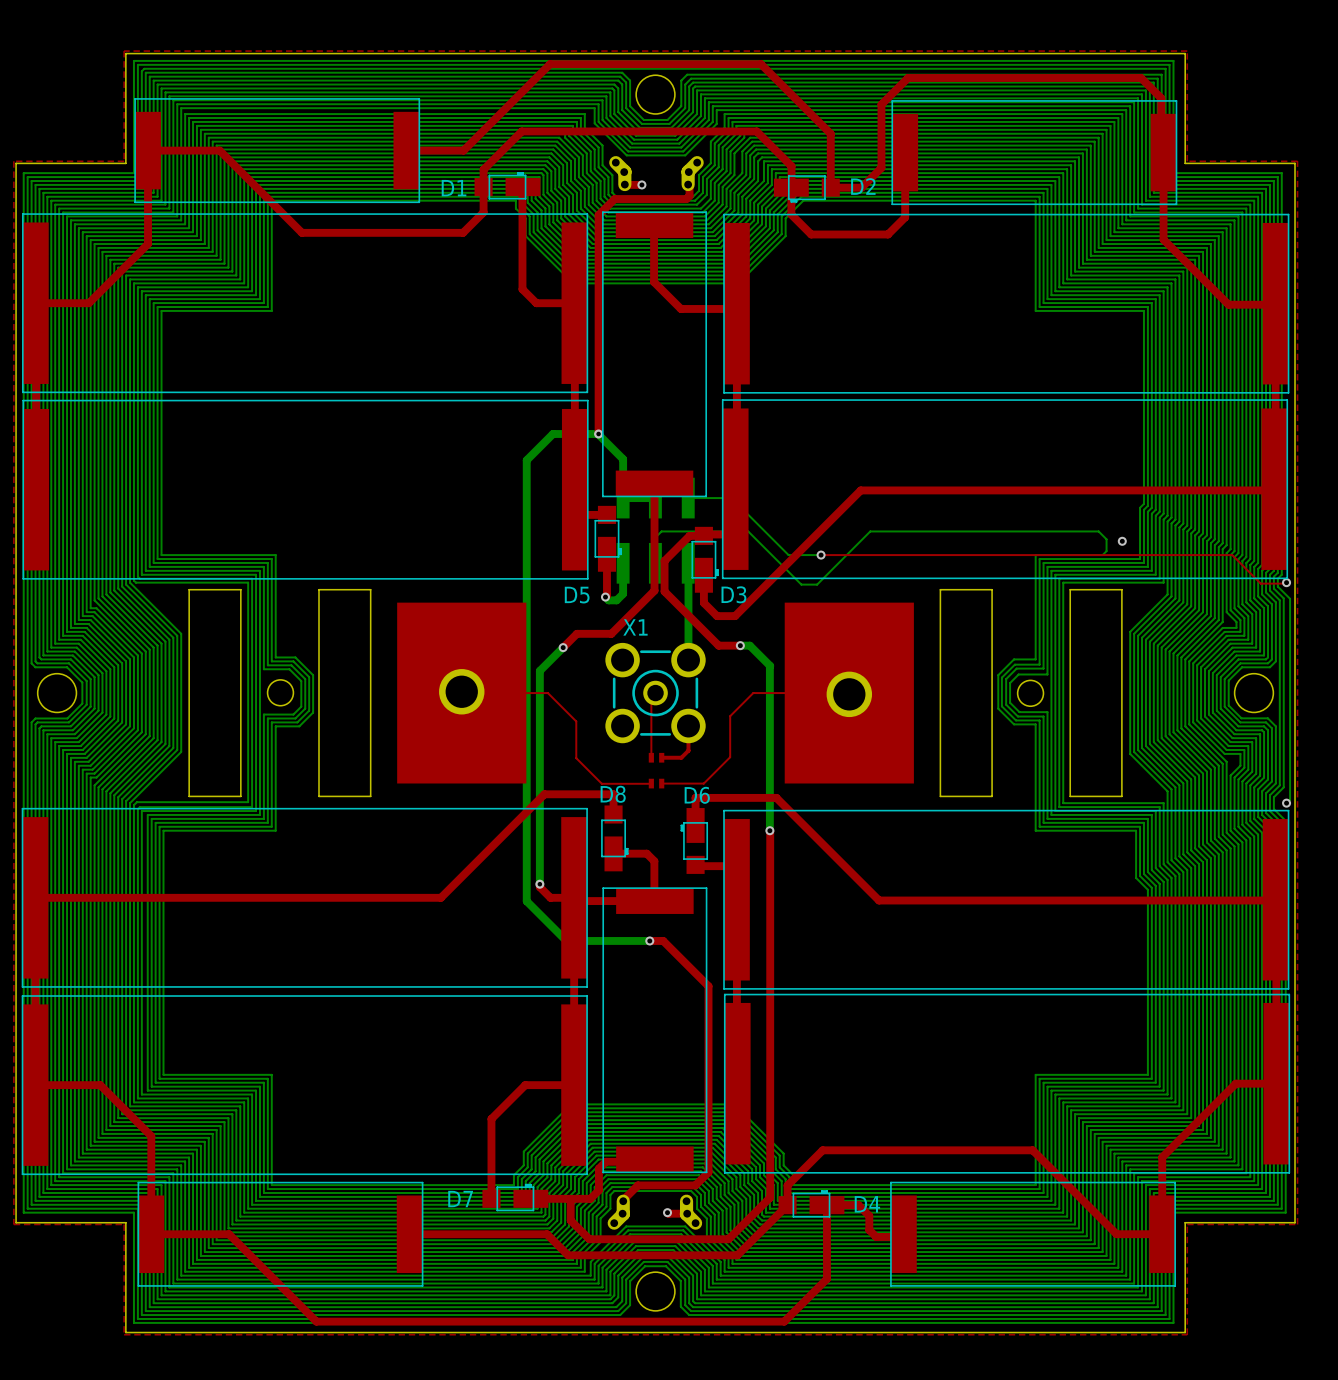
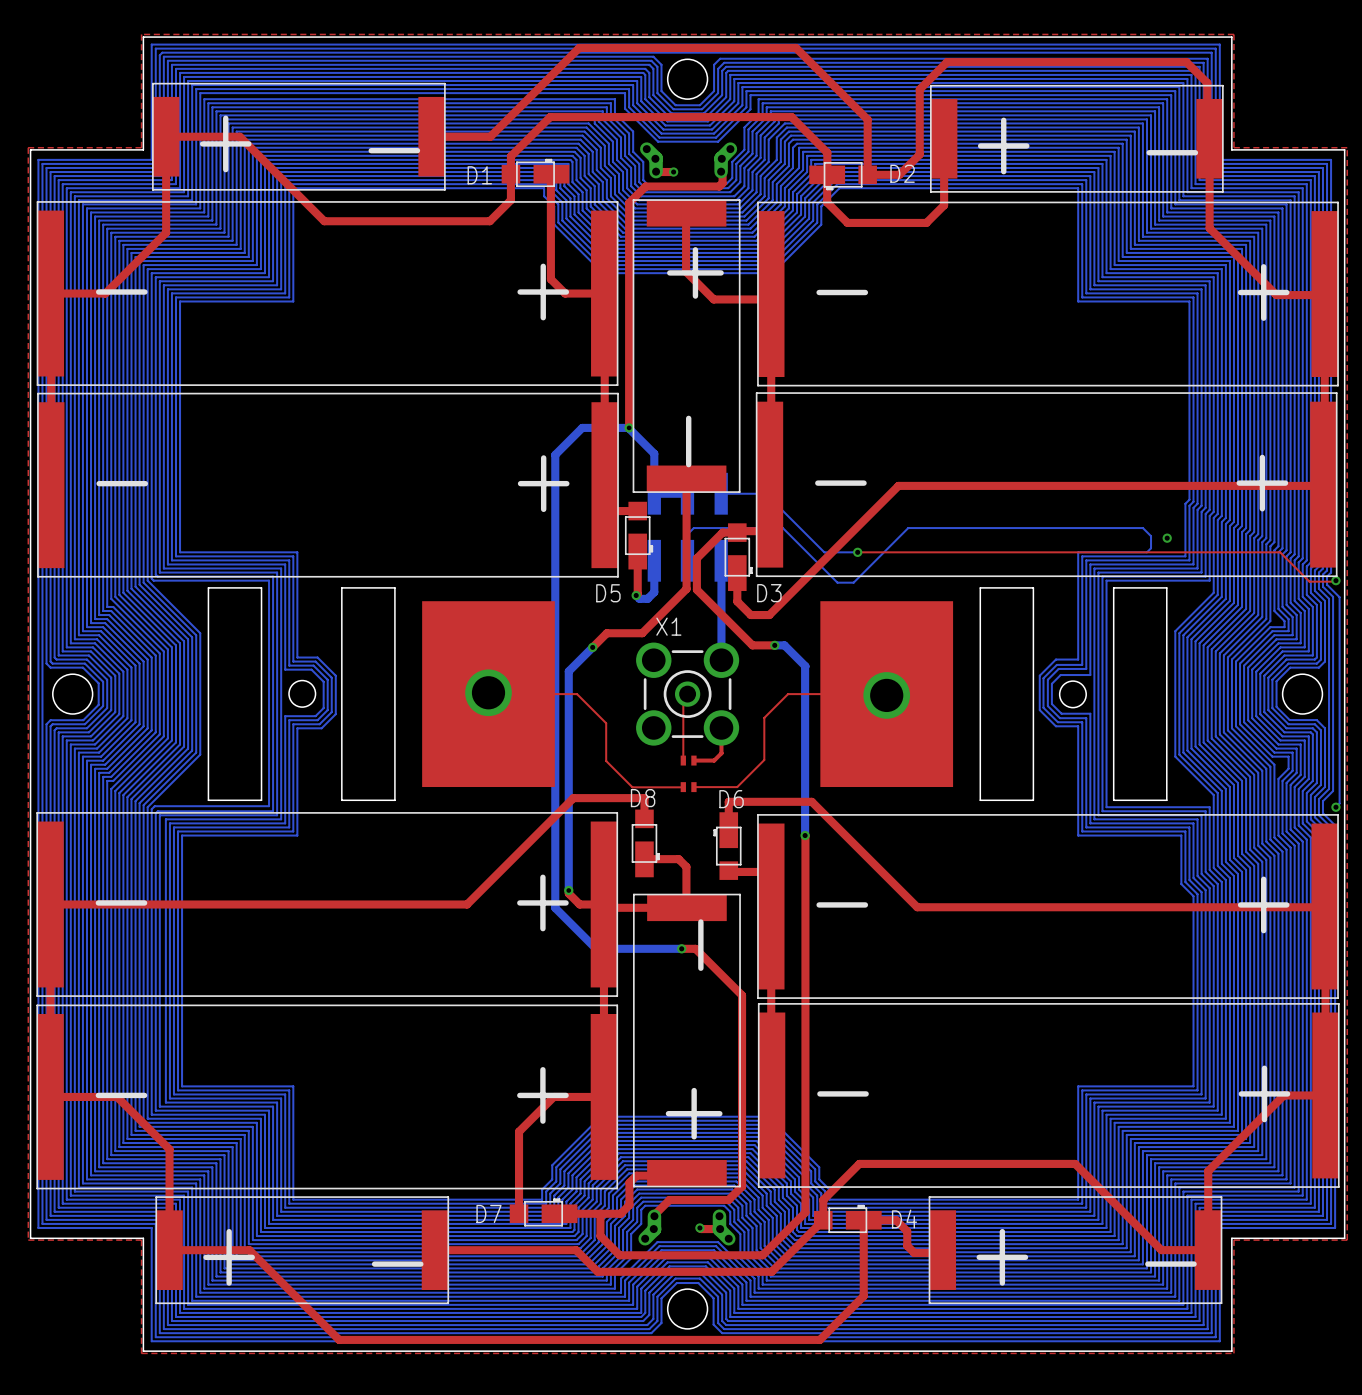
part text: none -> + (225, 143)
part text: none -> + (1003, 145)
part text: none -> - (394, 150)
part text: none -> - (1172, 152)
part text: none -> + (695, 272)
part text: none -> + (543, 292)
part text: none -> + (1263, 292)
part text: none -> - (121, 292)
part text: none -> - (842, 292)
part text: none -> - (688, 441)
part text: none -> + (1262, 483)
part text: none -> + (543, 483)
part text: none -> - (122, 483)
part text: none -> - (840, 483)
part text: none -> + (542, 902)
part text: none -> + (1263, 904)
part text: none -> - (121, 902)
part text: none -> - (842, 904)
part text: none -> - (700, 945)
part text: none -> + (1264, 1093)
part text: none -> + (542, 1095)
part text: none -> - (843, 1093)
part text: none -> - (121, 1095)
part text: none -> + (694, 1113)
part text: none -> + (1002, 1257)
part text: none -> + (229, 1257)
part text: none -> - (397, 1264)
part text: none -> - (1170, 1264)

